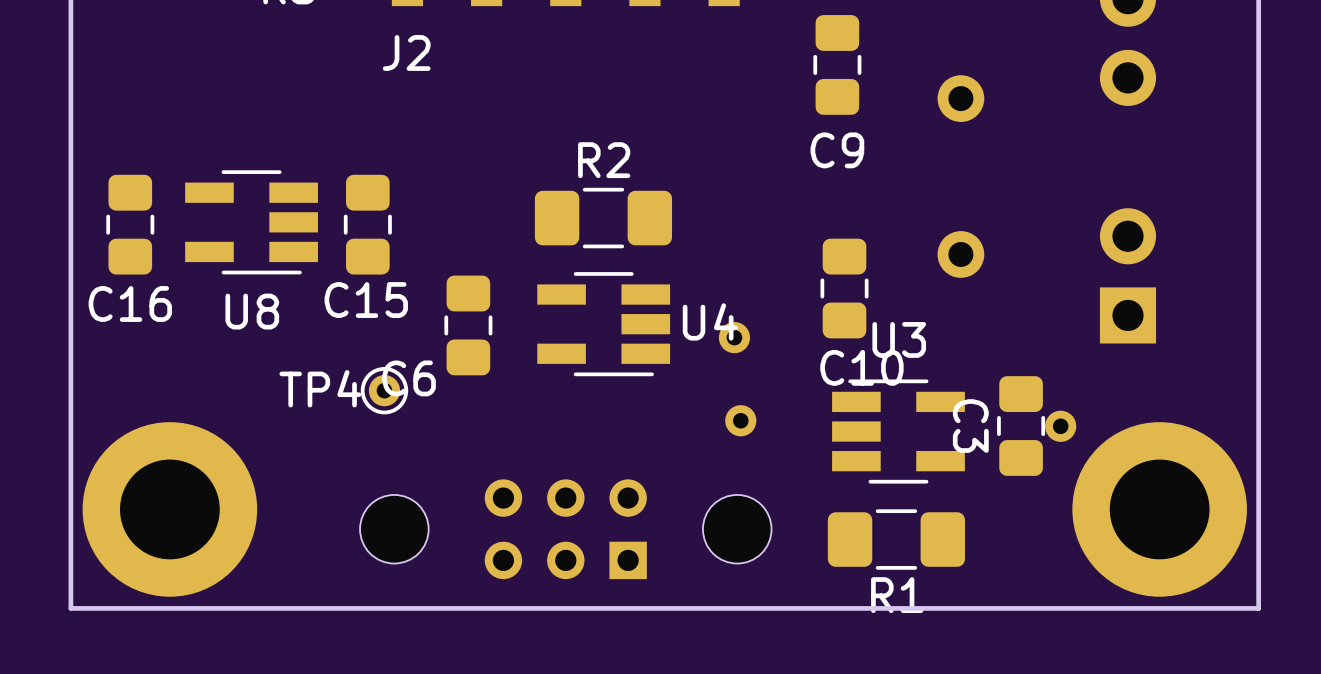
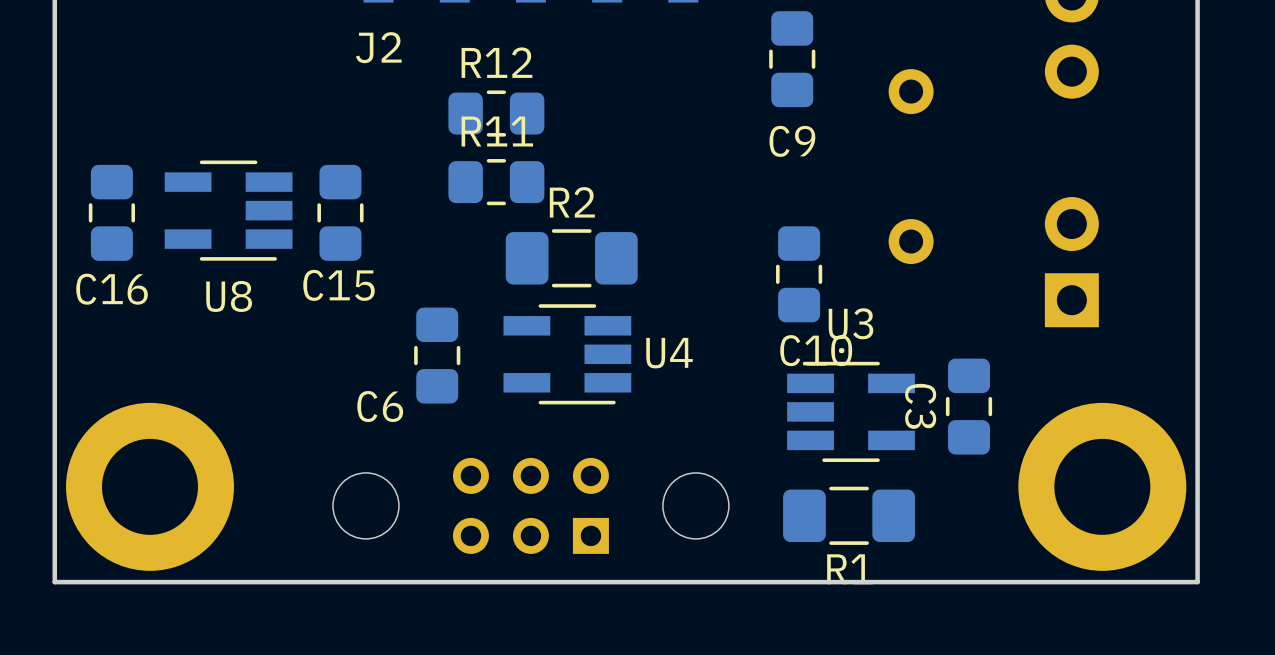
R12: none -> (496, 113)
R11: none -> (496, 182)
R2 position: (603, 218) -> (571, 258)
U4 position: (603, 324) -> (567, 354)
C6 position: (468, 325) -> (437, 355)
part: (734, 337) -> none
TP4: (384, 390) -> none
part: (740, 420) -> none
part: (1060, 426) -> none

